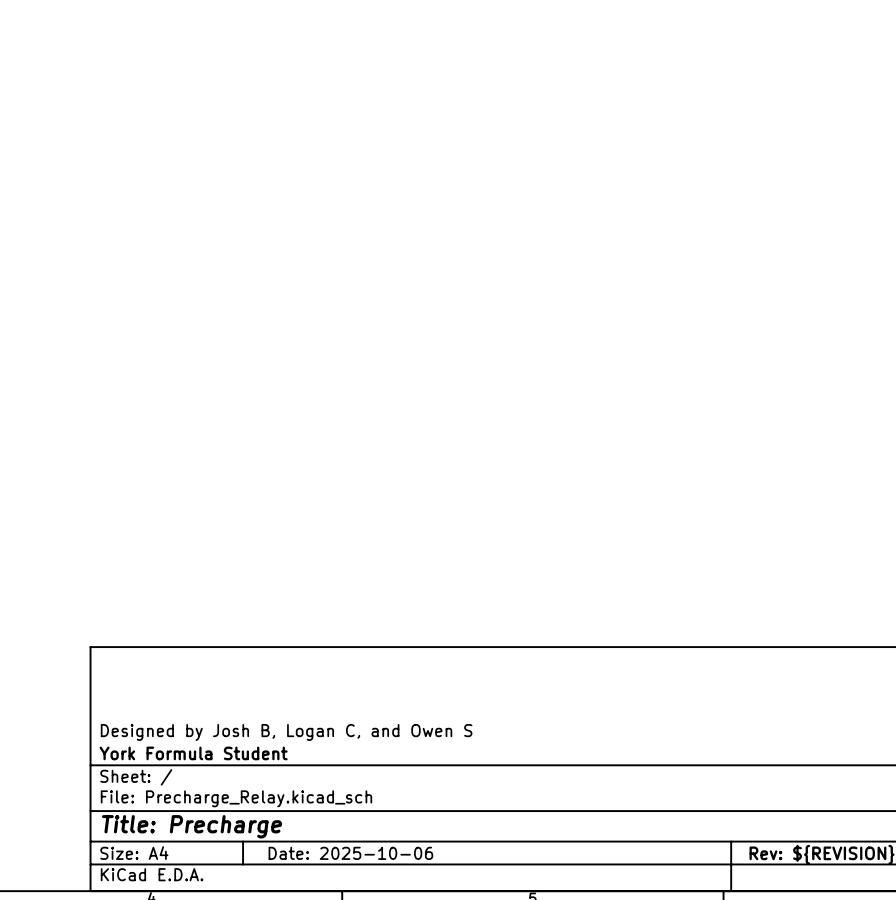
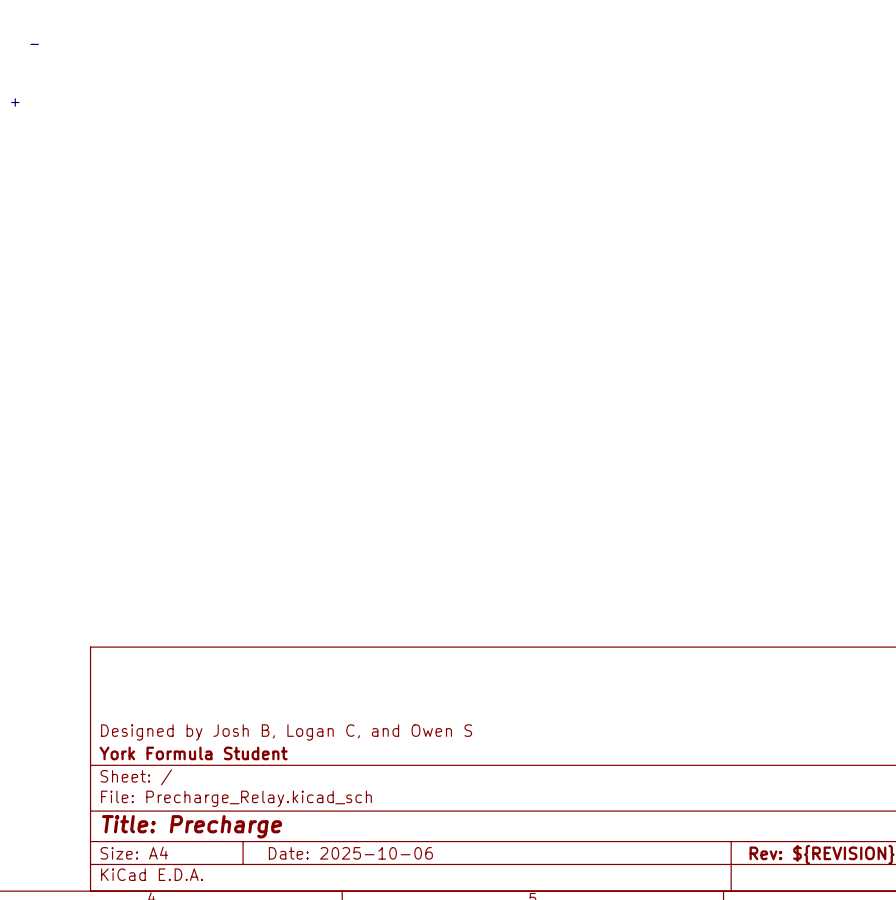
text: none -> - (34, 44)
text: none -> + (15, 102)

